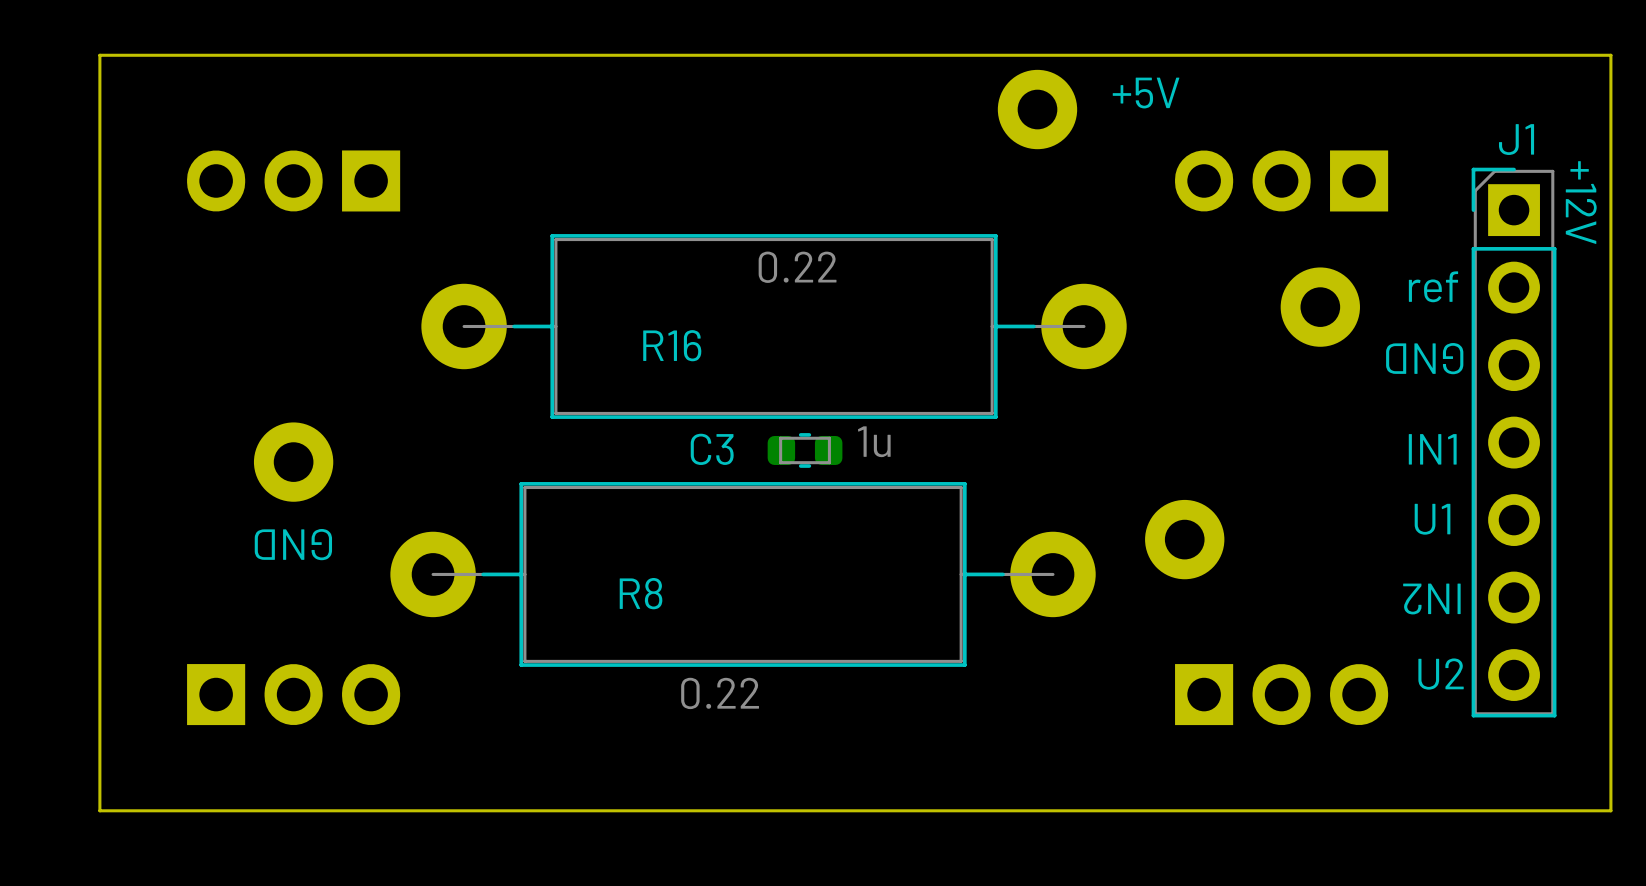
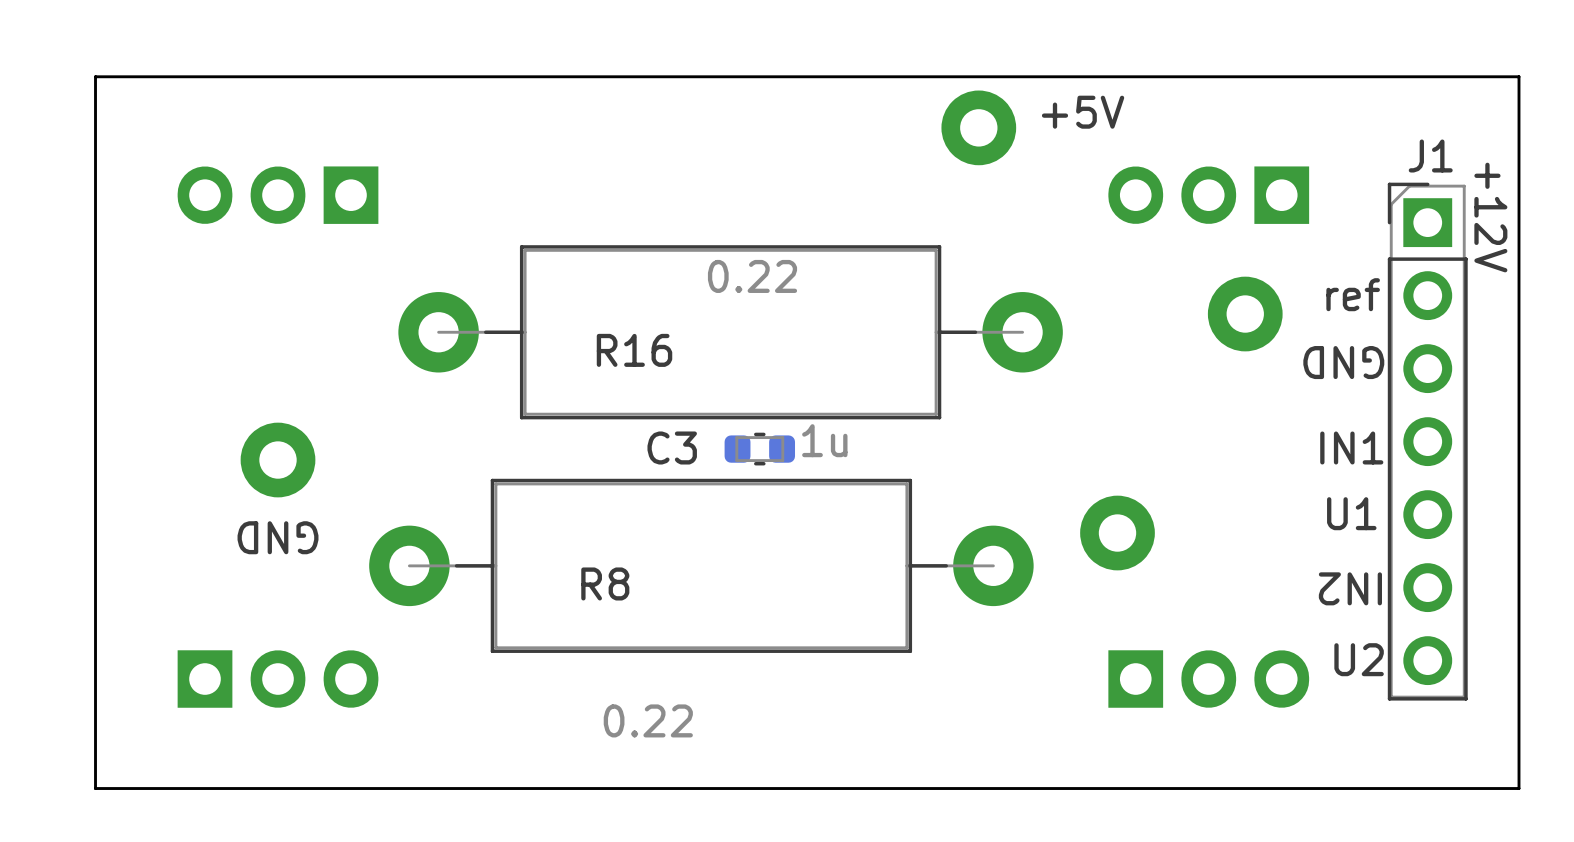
R8 value position: 0.22 (720, 693) -> 0.22 (648, 720)

